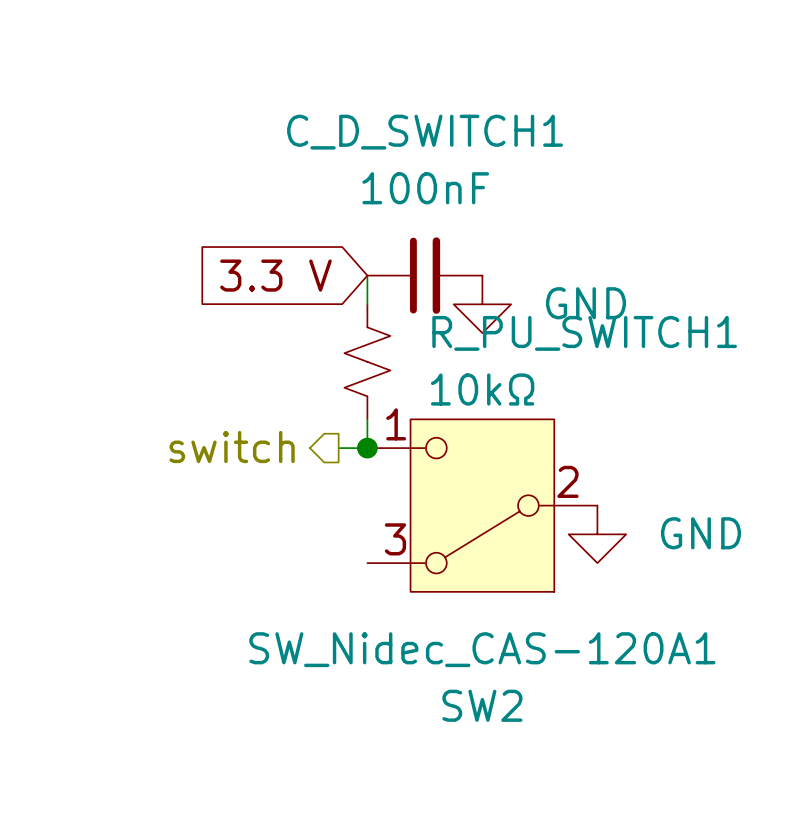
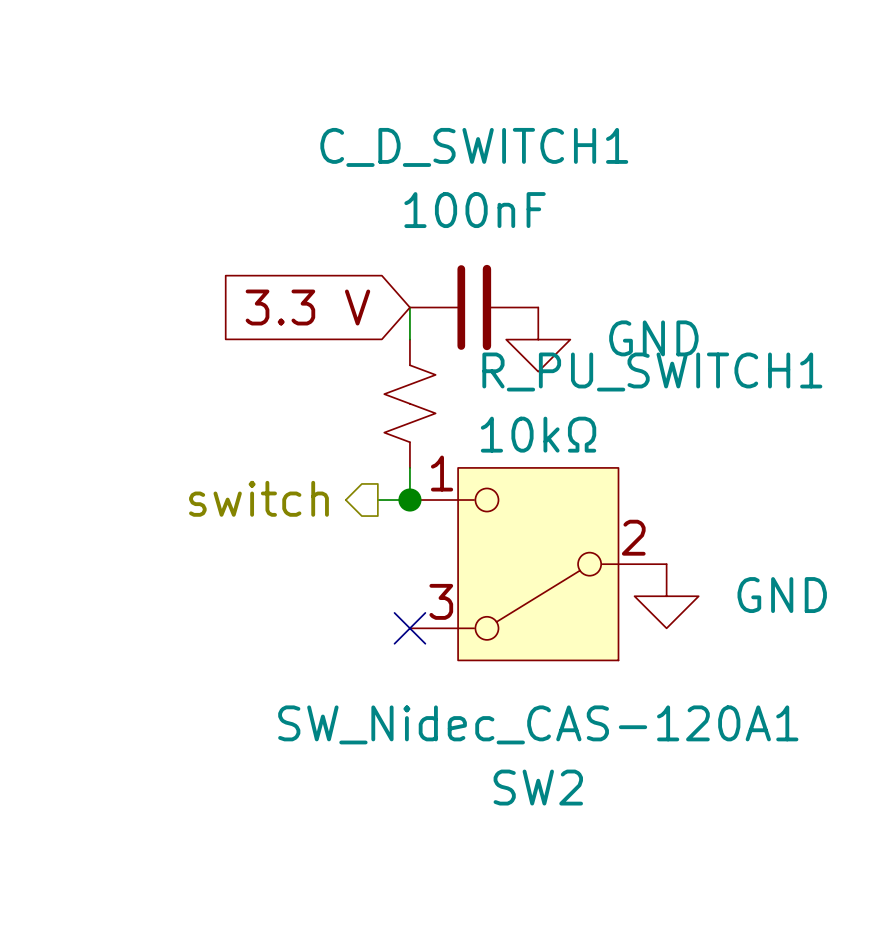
no-connect mark: none -> (409, 628)

